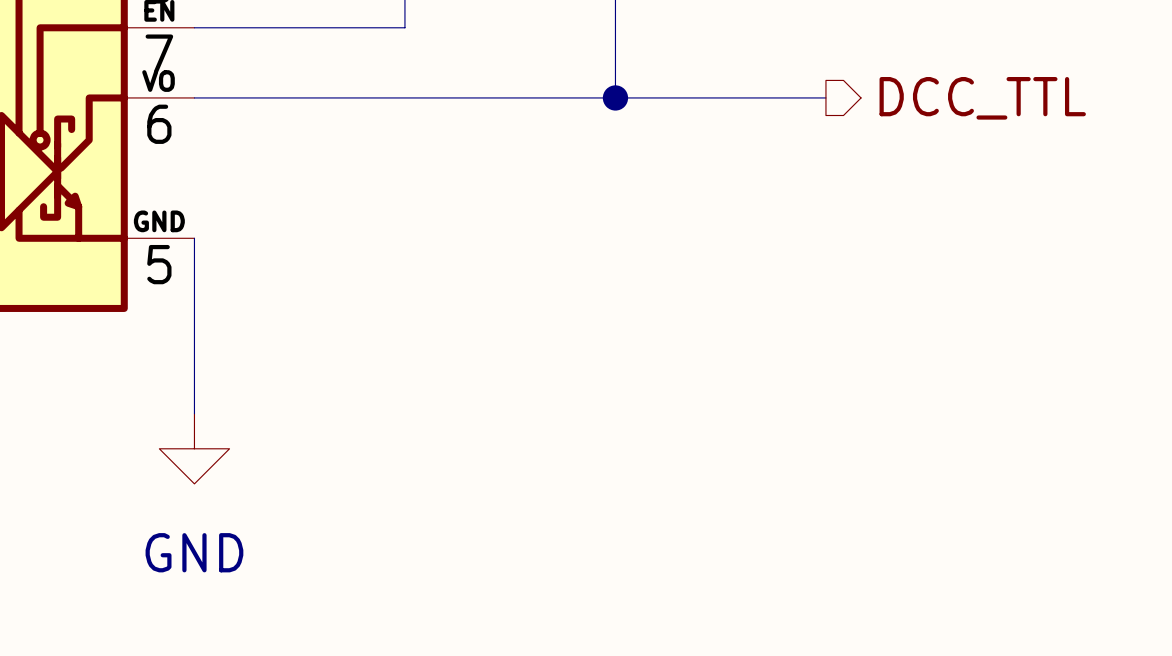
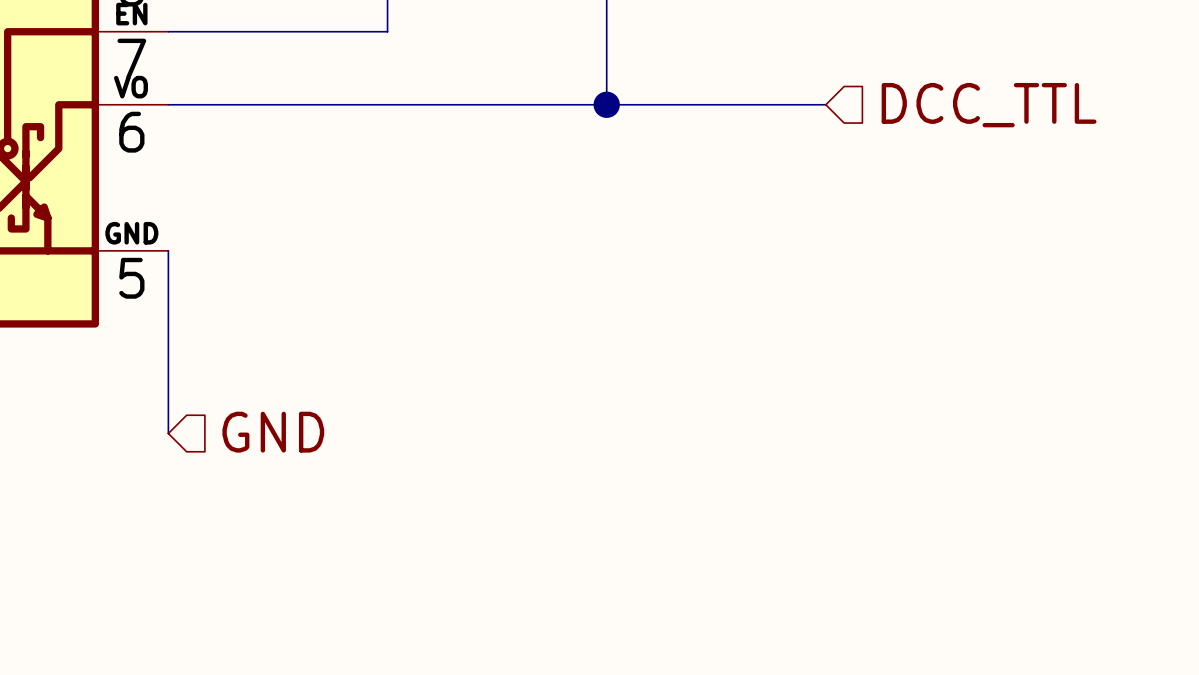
hierarchical label shape: output (982, 98) -> input (989, 105)
hierarchical label: none -> GND (273, 432)
power symbol: GND (194, 448) -> none

